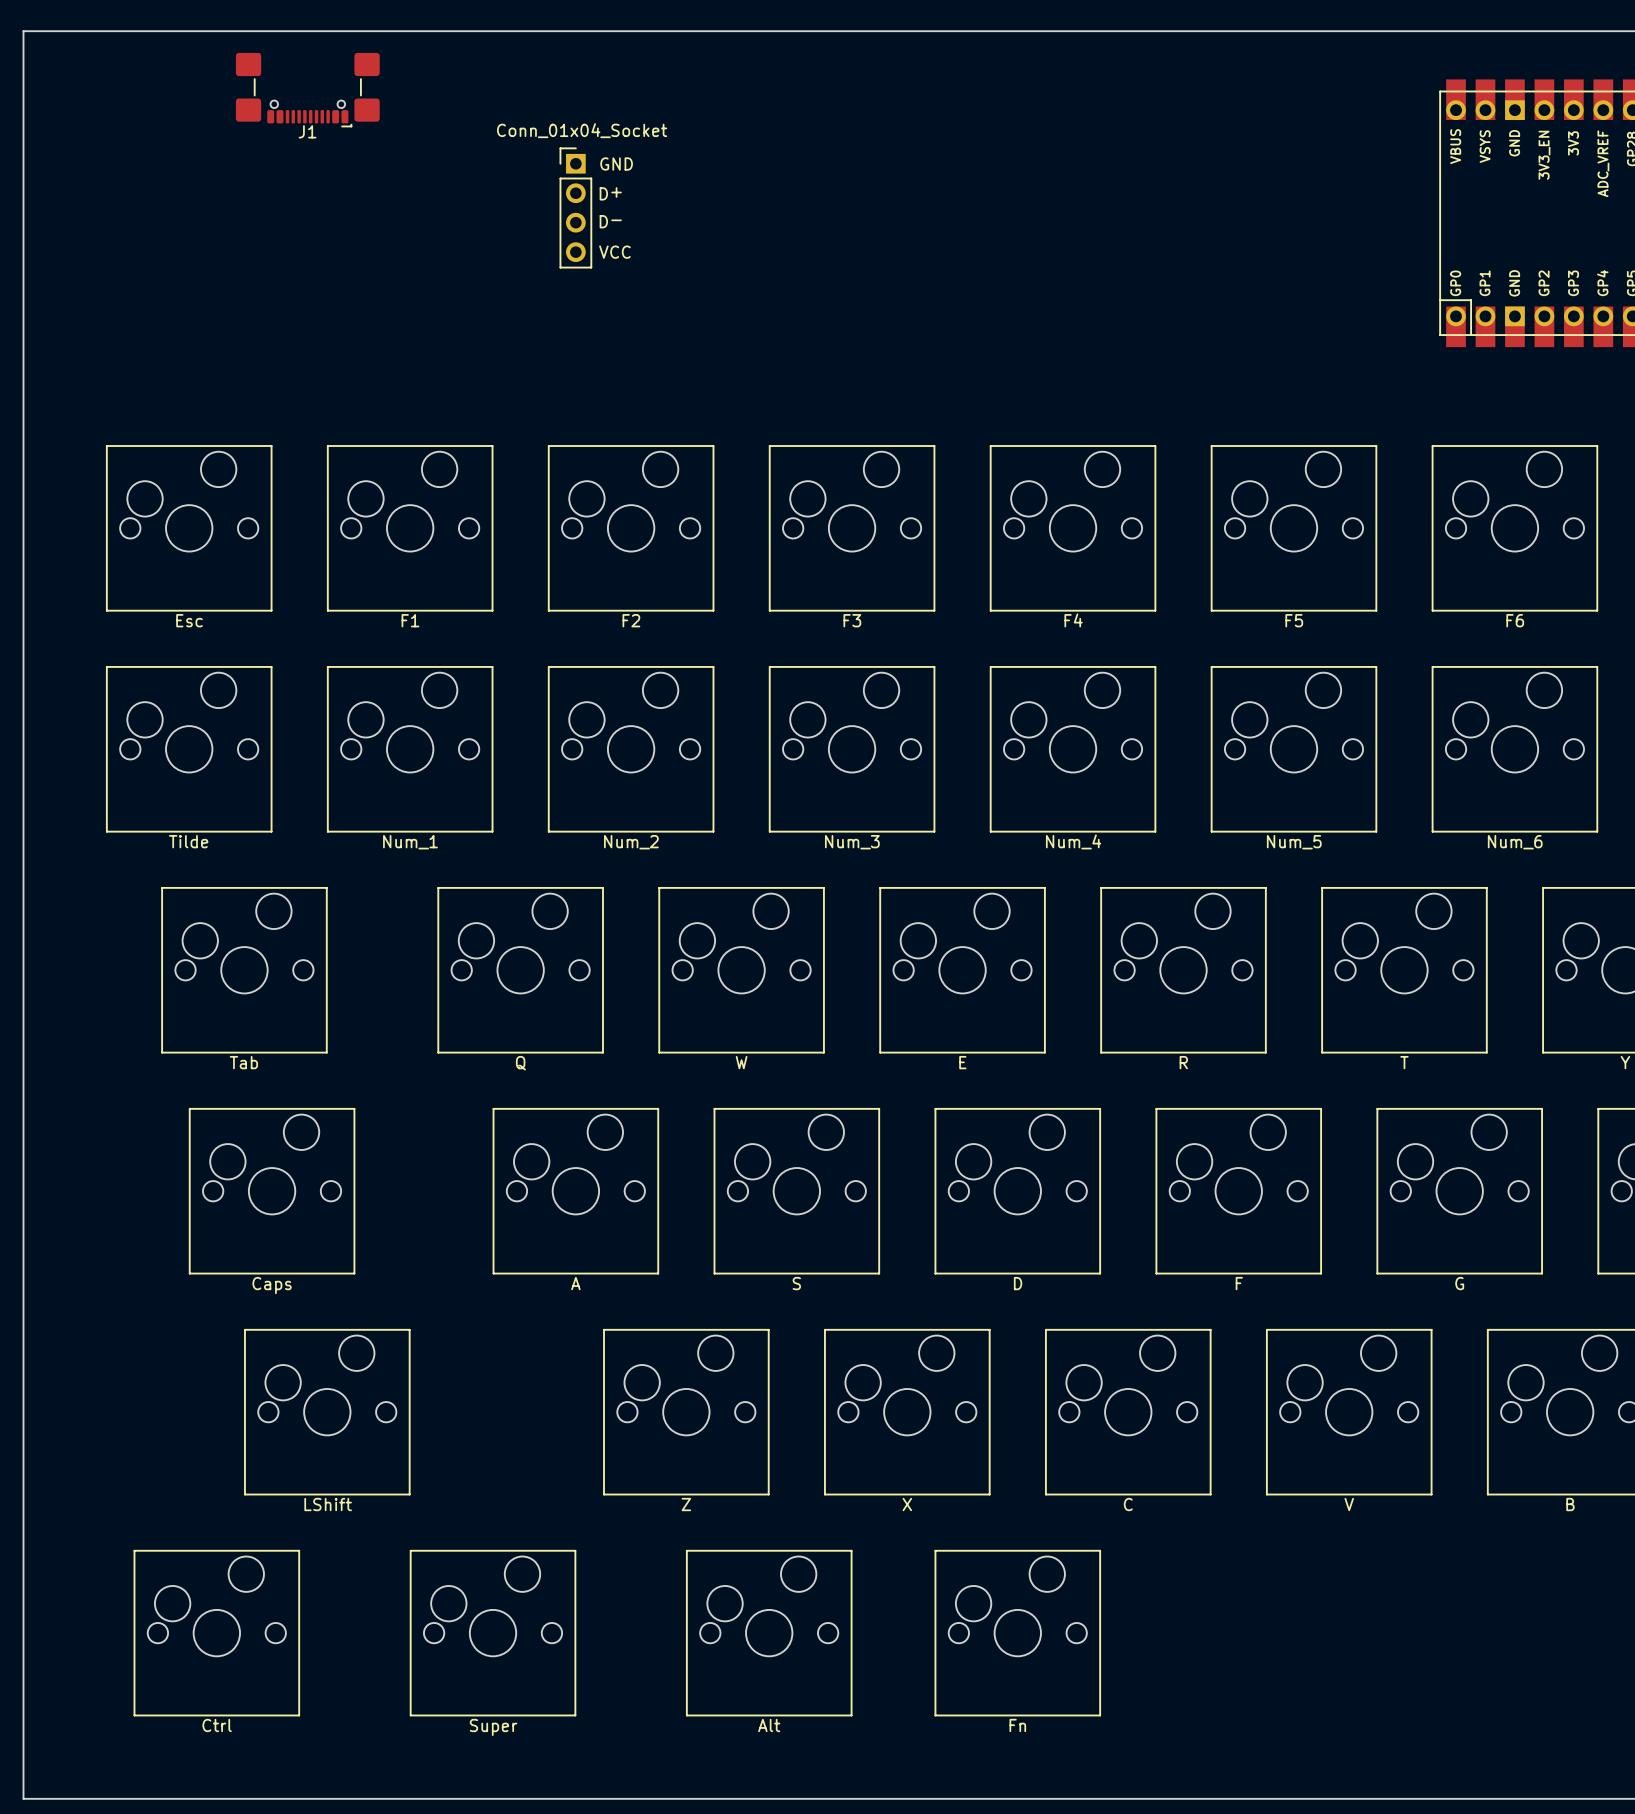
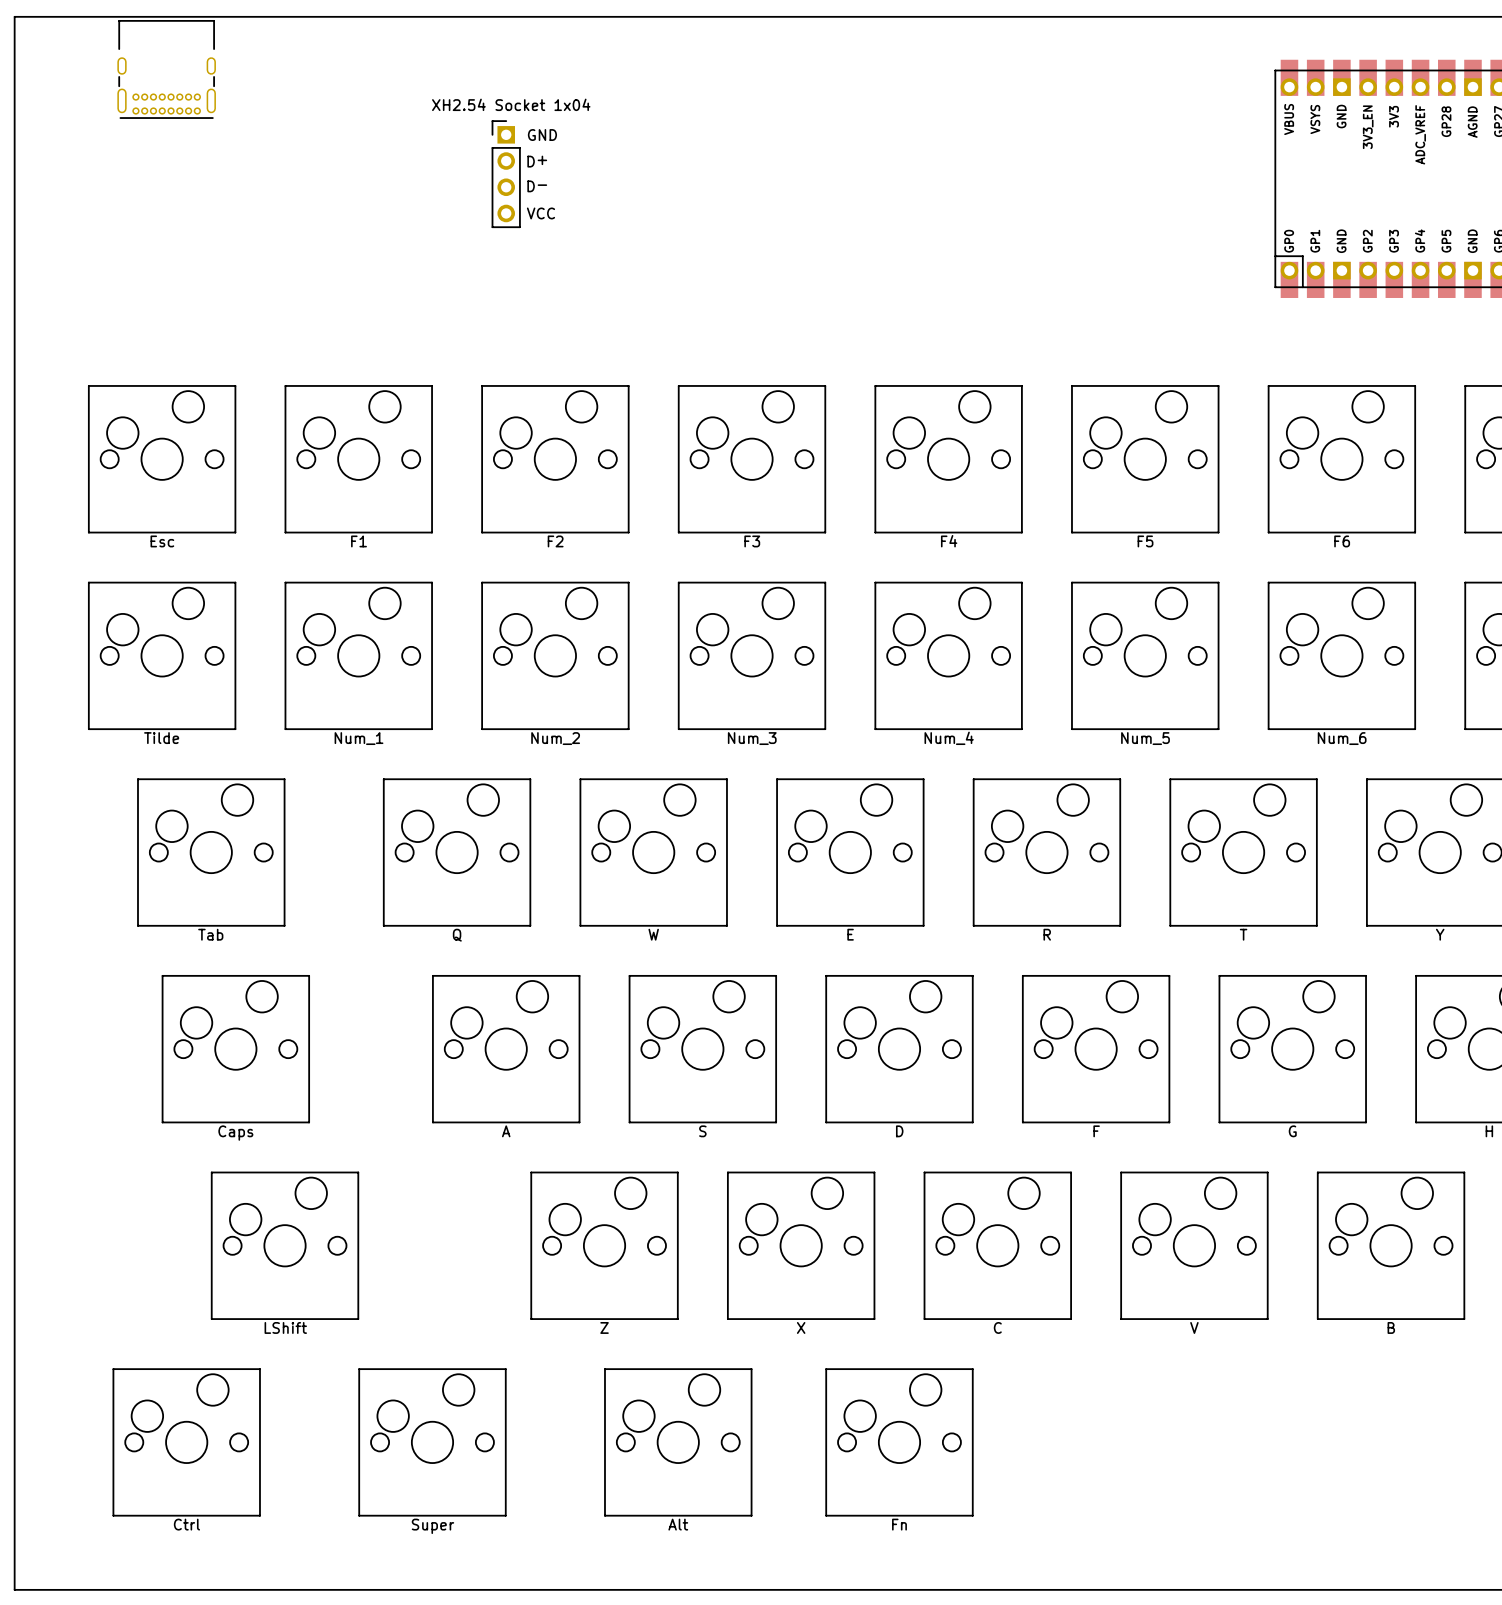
part: none -> (166, 69)
J1: (307, 90) -> none
part value: Conn_01x04_Socket (582, 130) -> XH2.54 Socket 1x04 (511, 104)

